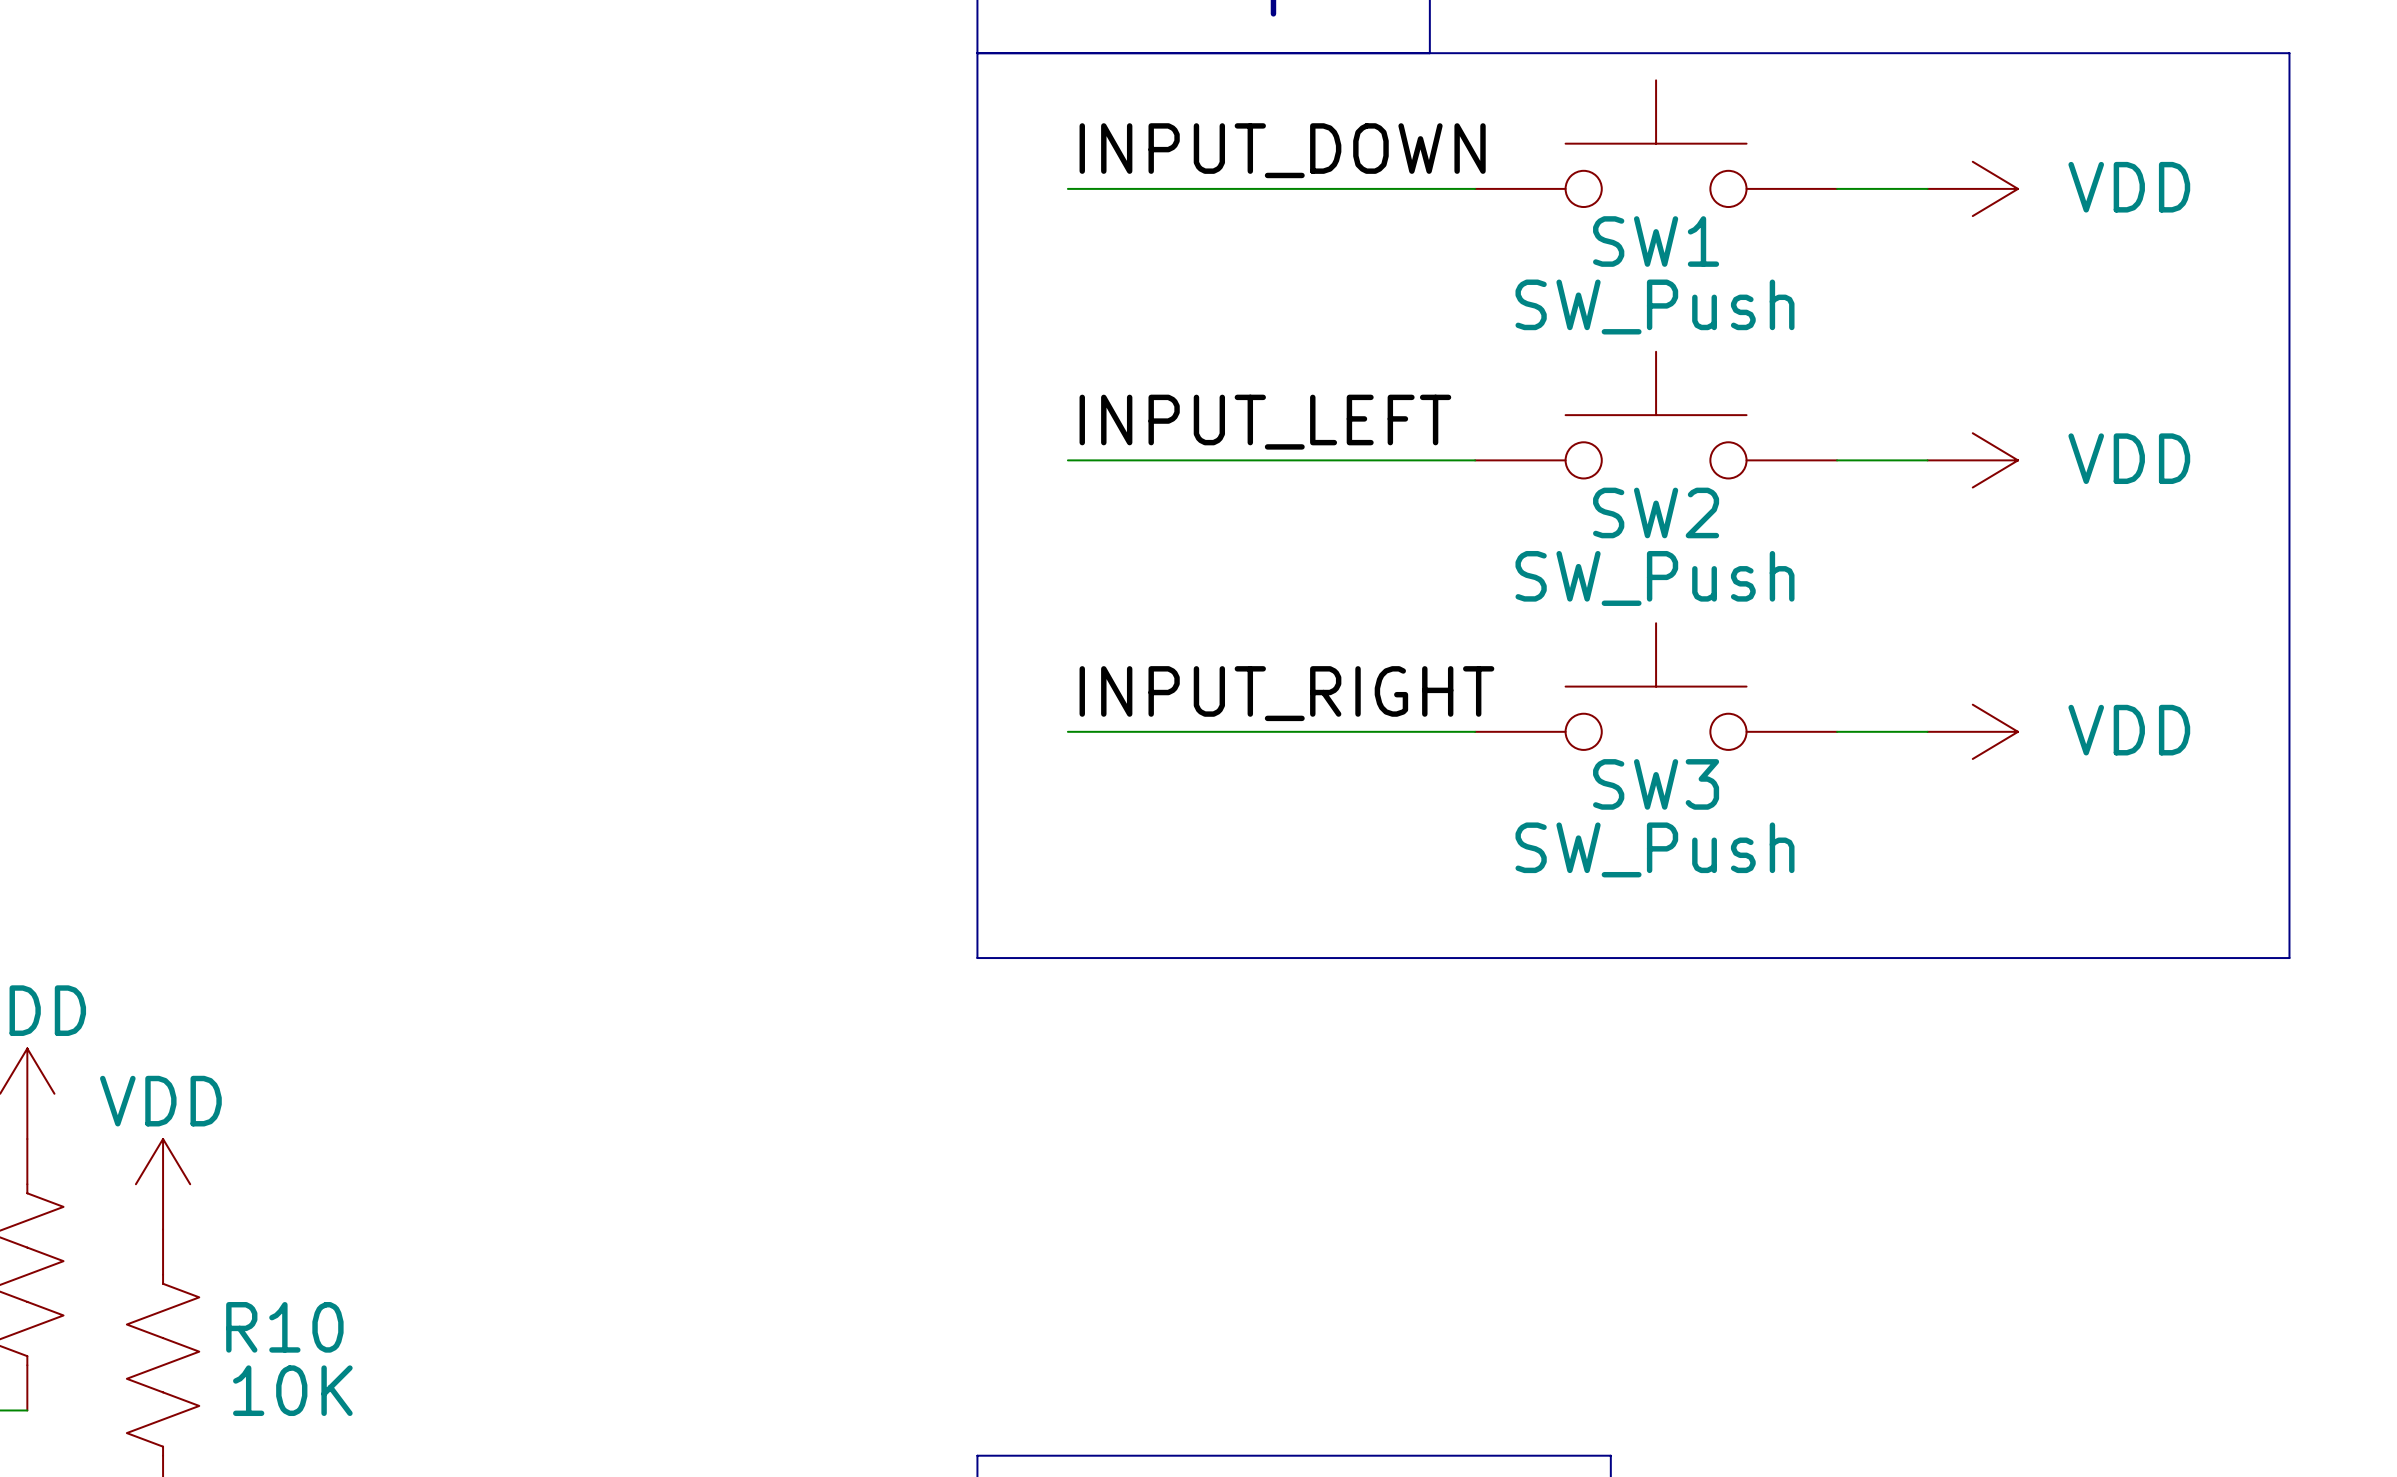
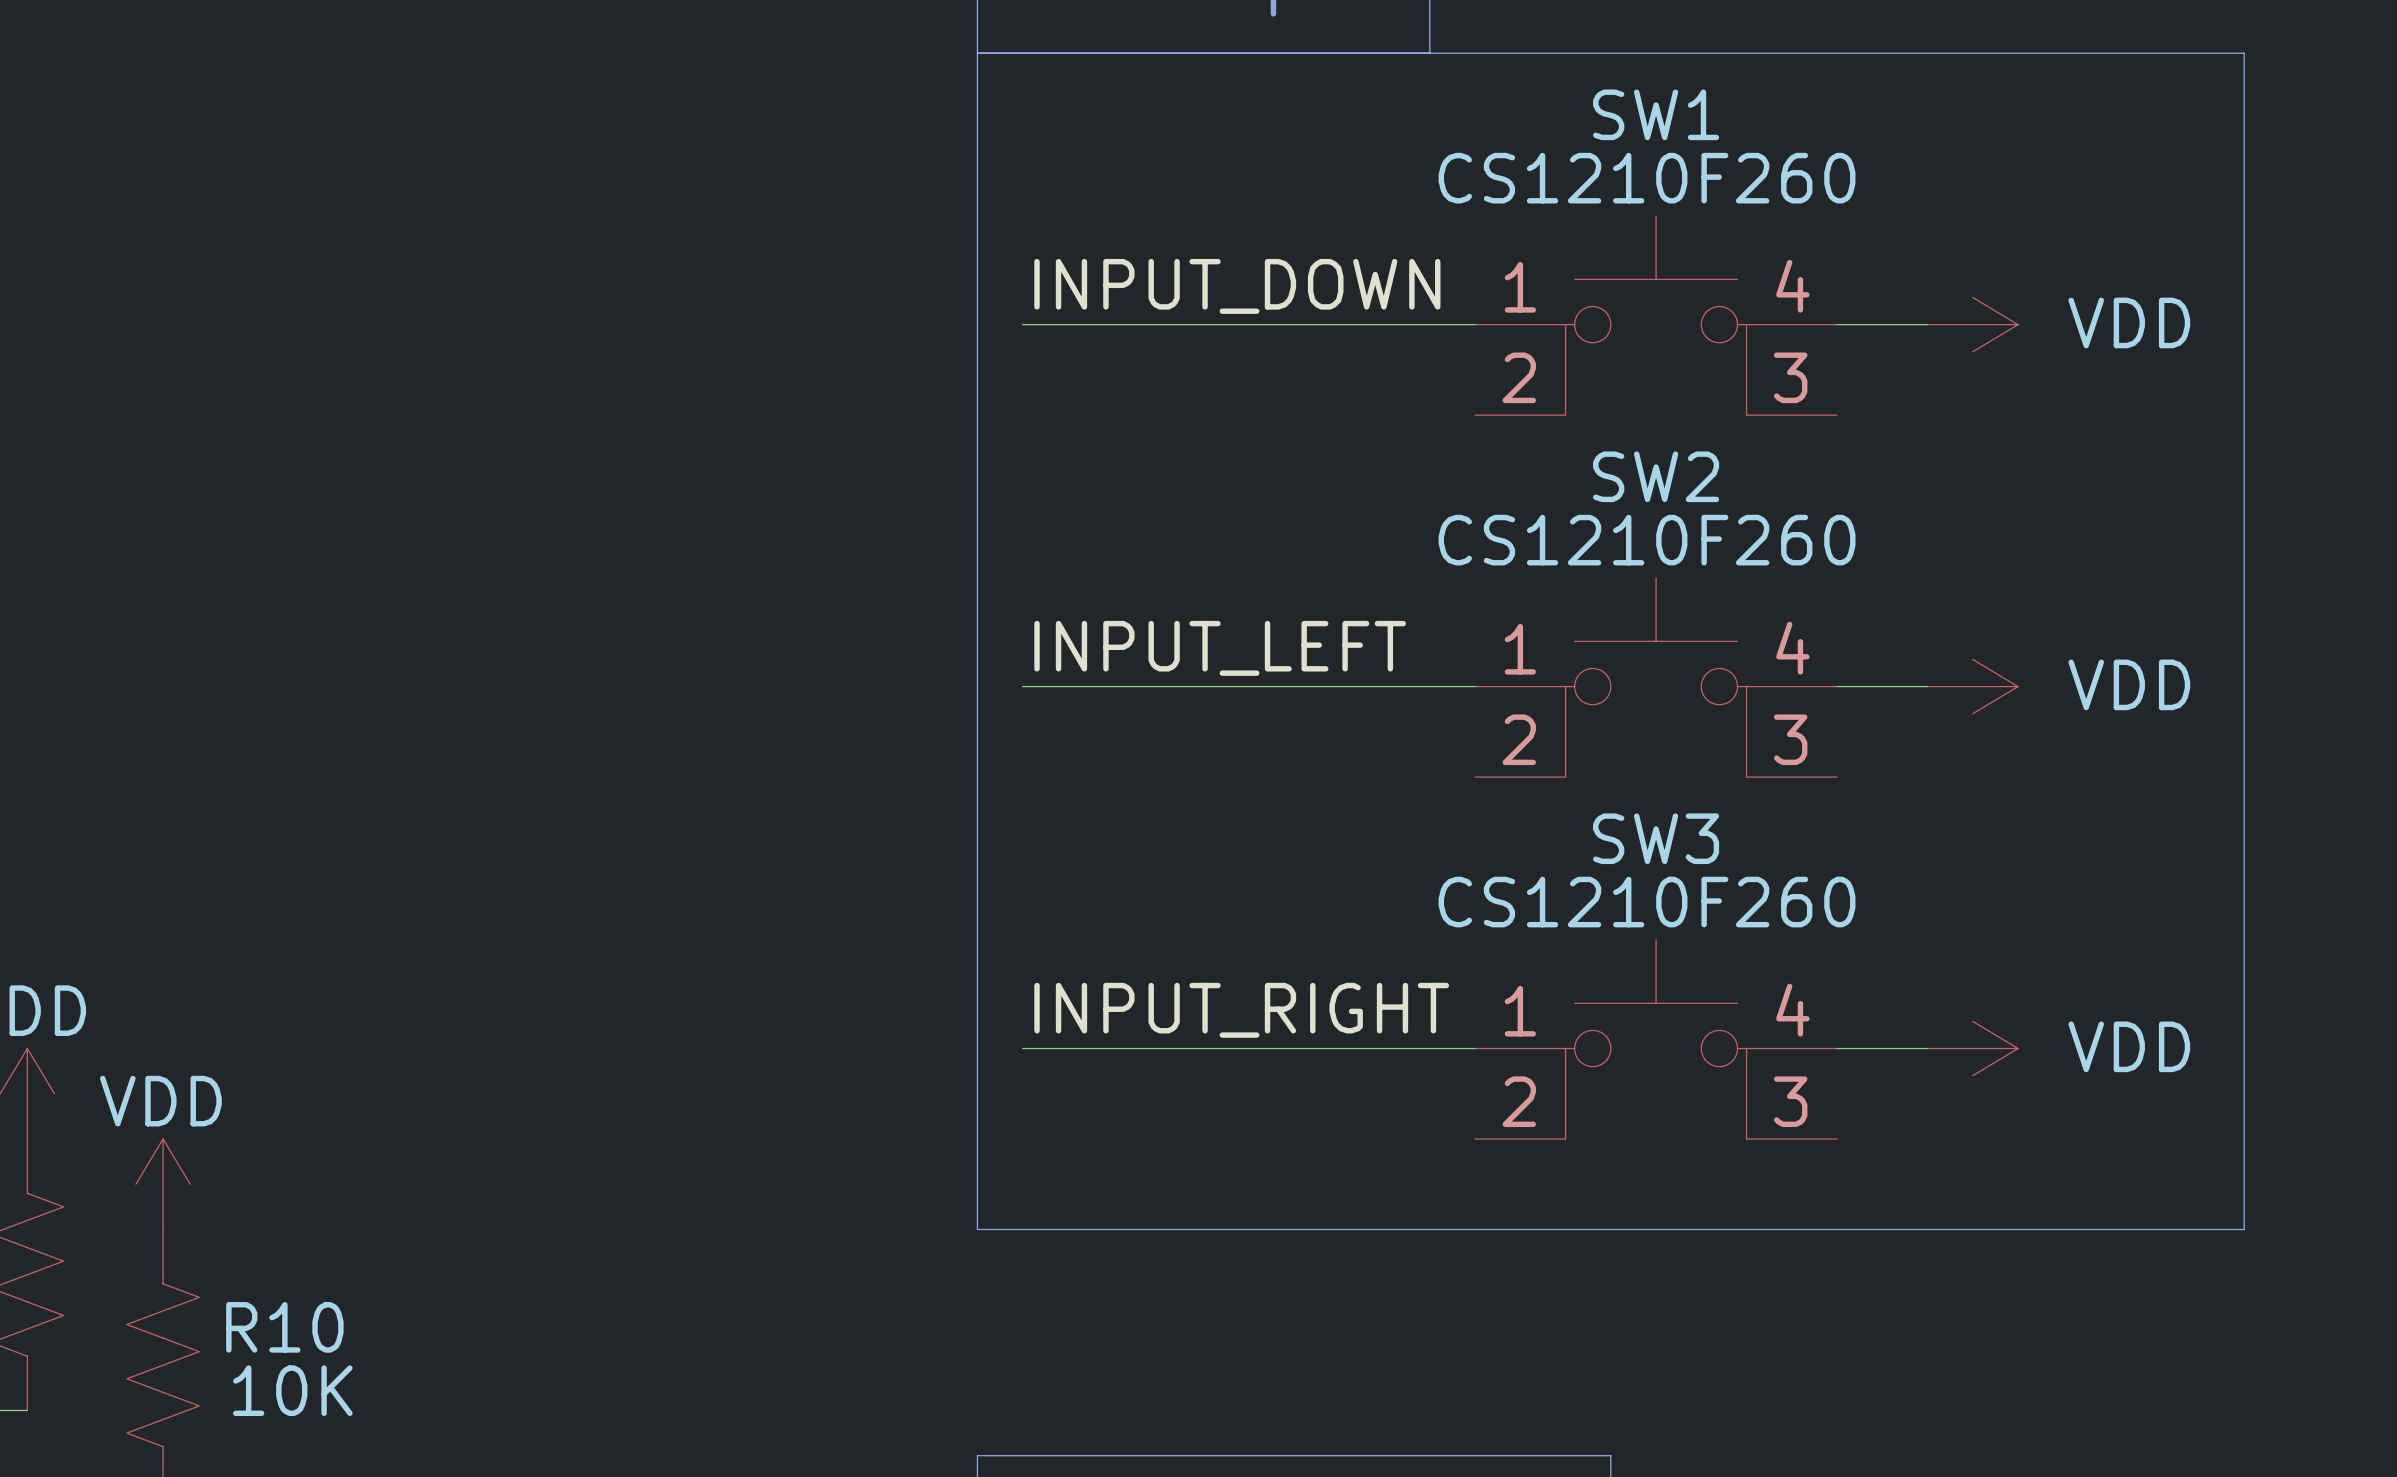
line: (2244, 53) (2289, 53) (2289, 958) (977, 958) -> (2244, 53) (2244, 1229) (977, 1229) (977, 958)
SW1 symbol: [1475, 80, 1838, 208] -> [1475, 216, 1838, 416]
label position: INPUT_DOWN (1282, 150) -> INPUT_DOWN (1237, 286)
wire: (1067, 188) (1475, 188) -> none
wire: (1837, 188) (1927, 188) -> (1837, 324) (1927, 324)
power symbol: VDD (1972, 188) -> none
SW1 name position: SW1 (1656, 241) -> SW1 (1656, 114)
SW1 value: SW_Push (1655, 307) -> CS1210F260 (1647, 178)
wire: none -> (1022, 324) (1475, 324)
power symbol: none -> VDD (1972, 324)
SW2 symbol: [1475, 351, 1838, 479] -> [1475, 578, 1838, 778]
label position: INPUT_LEFT (1265, 422) -> INPUT_LEFT (1220, 648)
wire: (1067, 460) (1475, 460) -> none
wire: (1837, 460) (1927, 460) -> (1837, 1048) (1927, 1048)
power symbol: VDD (1972, 460) -> none
SW2 name position: SW2 (1656, 512) -> SW2 (1656, 476)
SW2 value: SW_Push (1655, 578) -> CS1210F260 (1647, 540)
SW3 symbol: [1475, 623, 1838, 750] -> [1475, 939, 1838, 1140]
wire: none -> (1022, 686) (1475, 686)
label position: INPUT_RIGHT (1286, 693) -> INPUT_RIGHT (1241, 1010)
wire: (1067, 731) (1475, 731) -> none
wire: (1837, 731) (1927, 731) -> (1837, 686) (1927, 686)
power symbol position: VDD (1972, 731) -> VDD (1972, 686)
SW3 name position: SW3 (1656, 784) -> SW3 (1656, 838)
SW3 value: SW_Push (1655, 849) -> CS1210F260 (1647, 902)
wire: none -> (1022, 1048) (1475, 1048)
power symbol: none -> VDD (1972, 1048)

